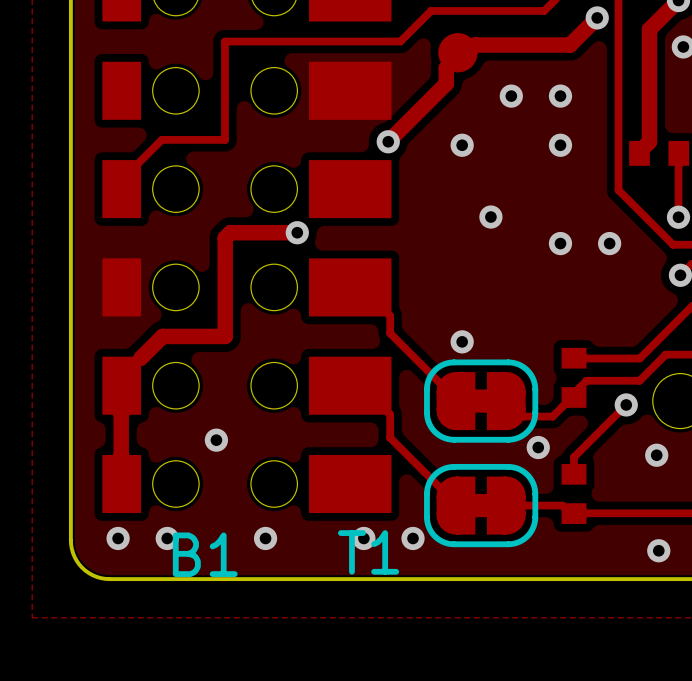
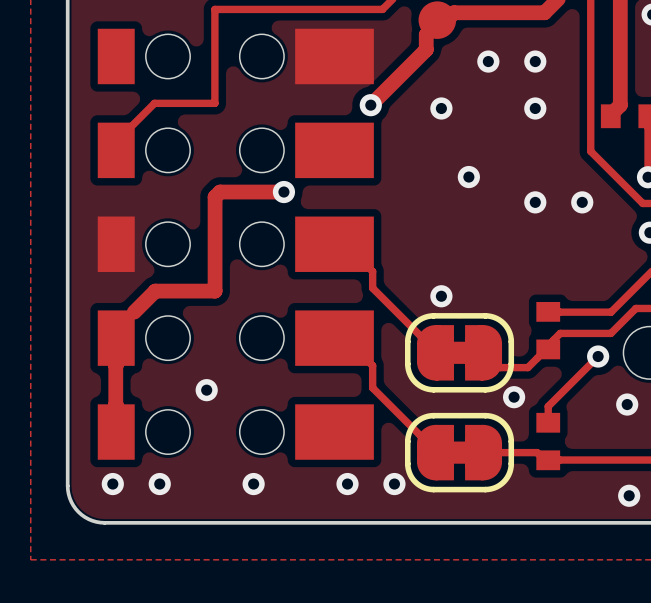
part text: T1 (368, 552) -> none
part text: B1 (205, 554) -> none

